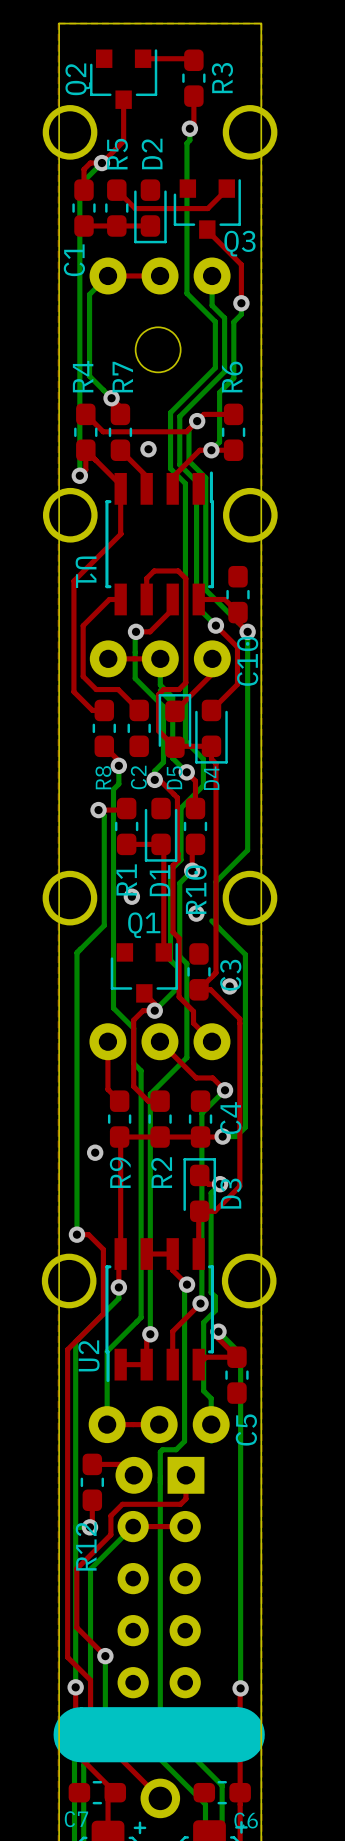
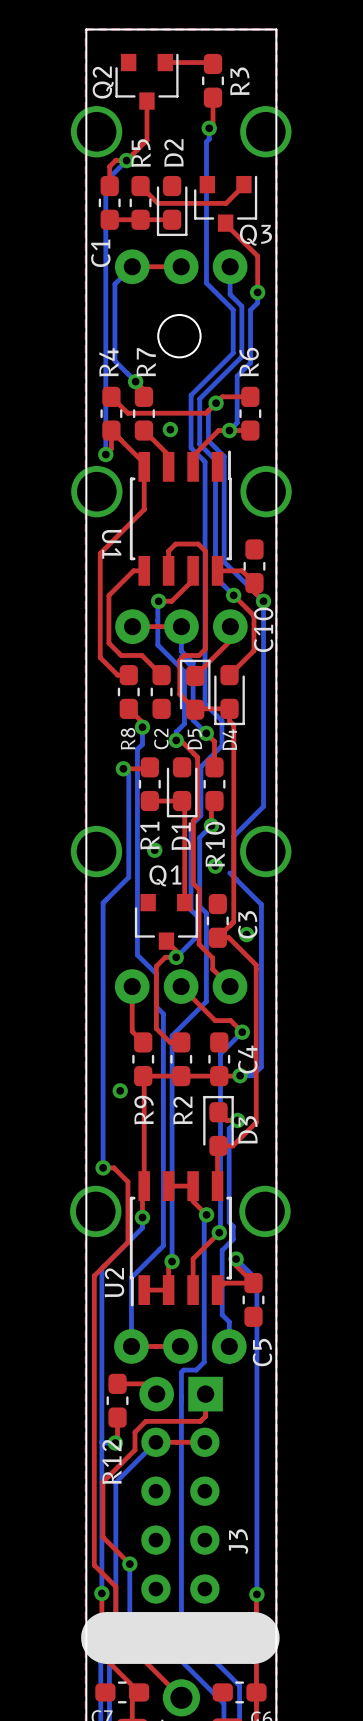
J3 name: none -> J3 (238, 1541)

